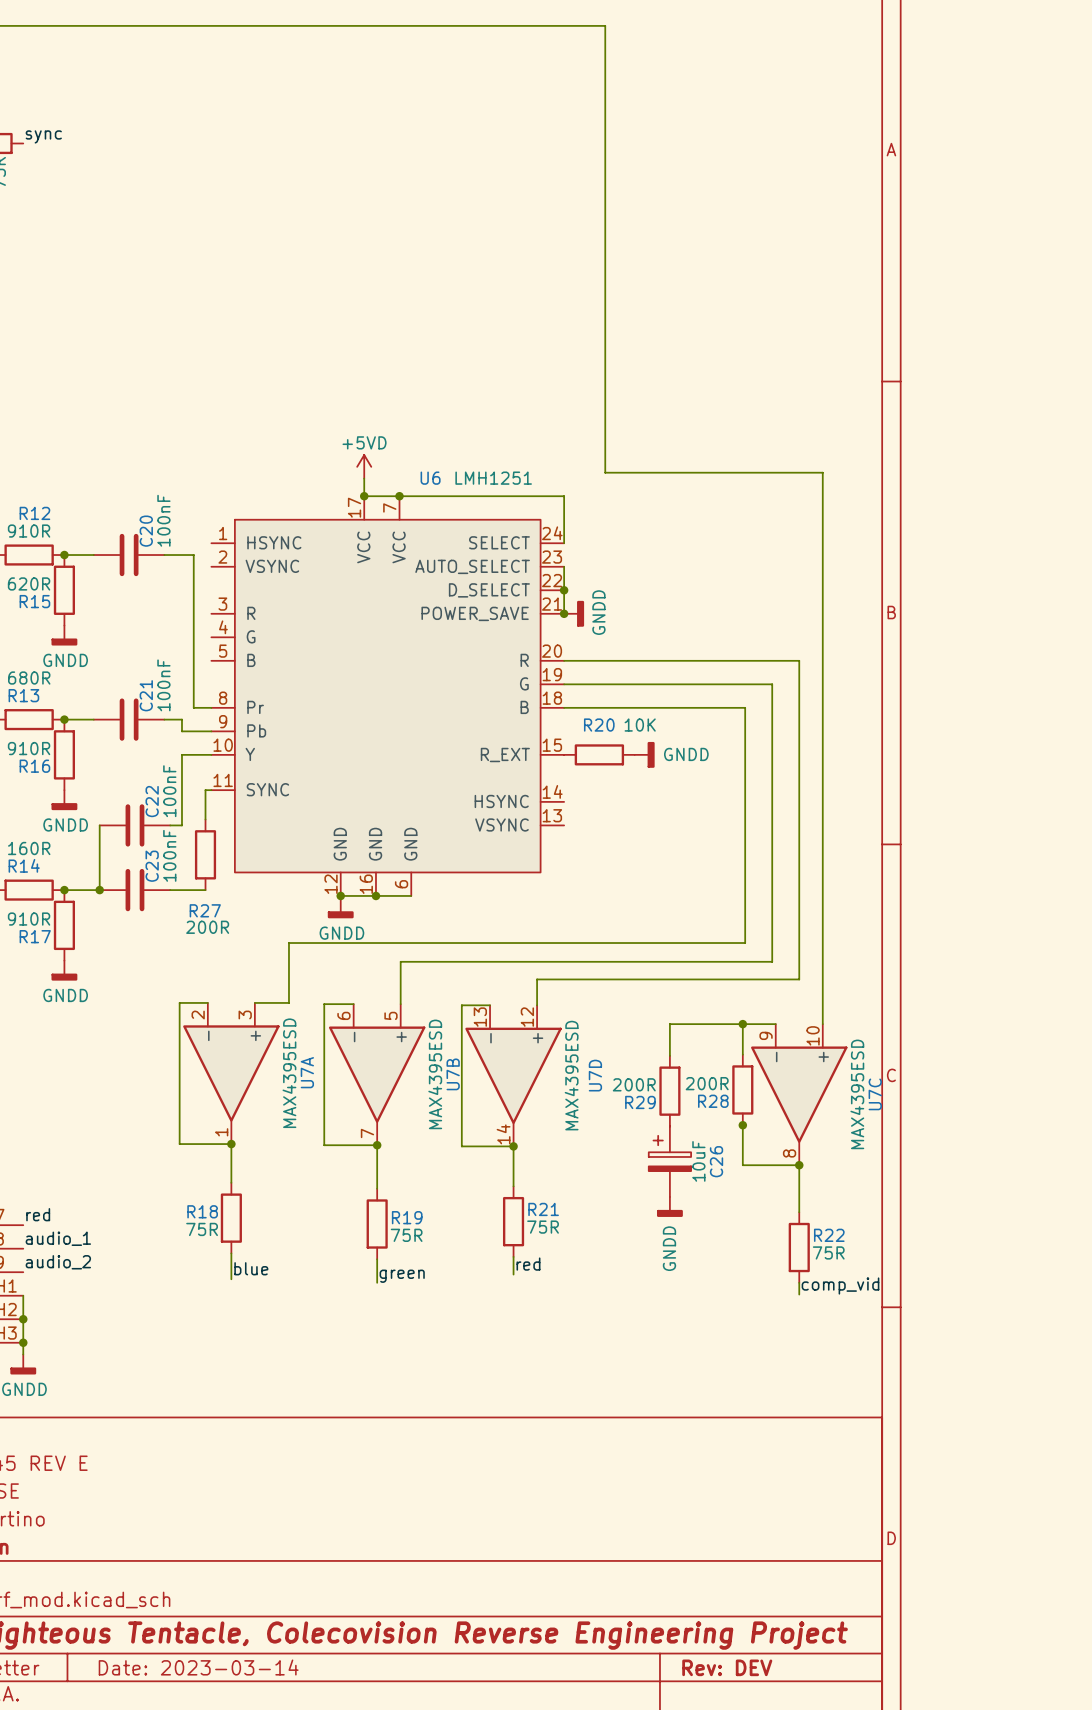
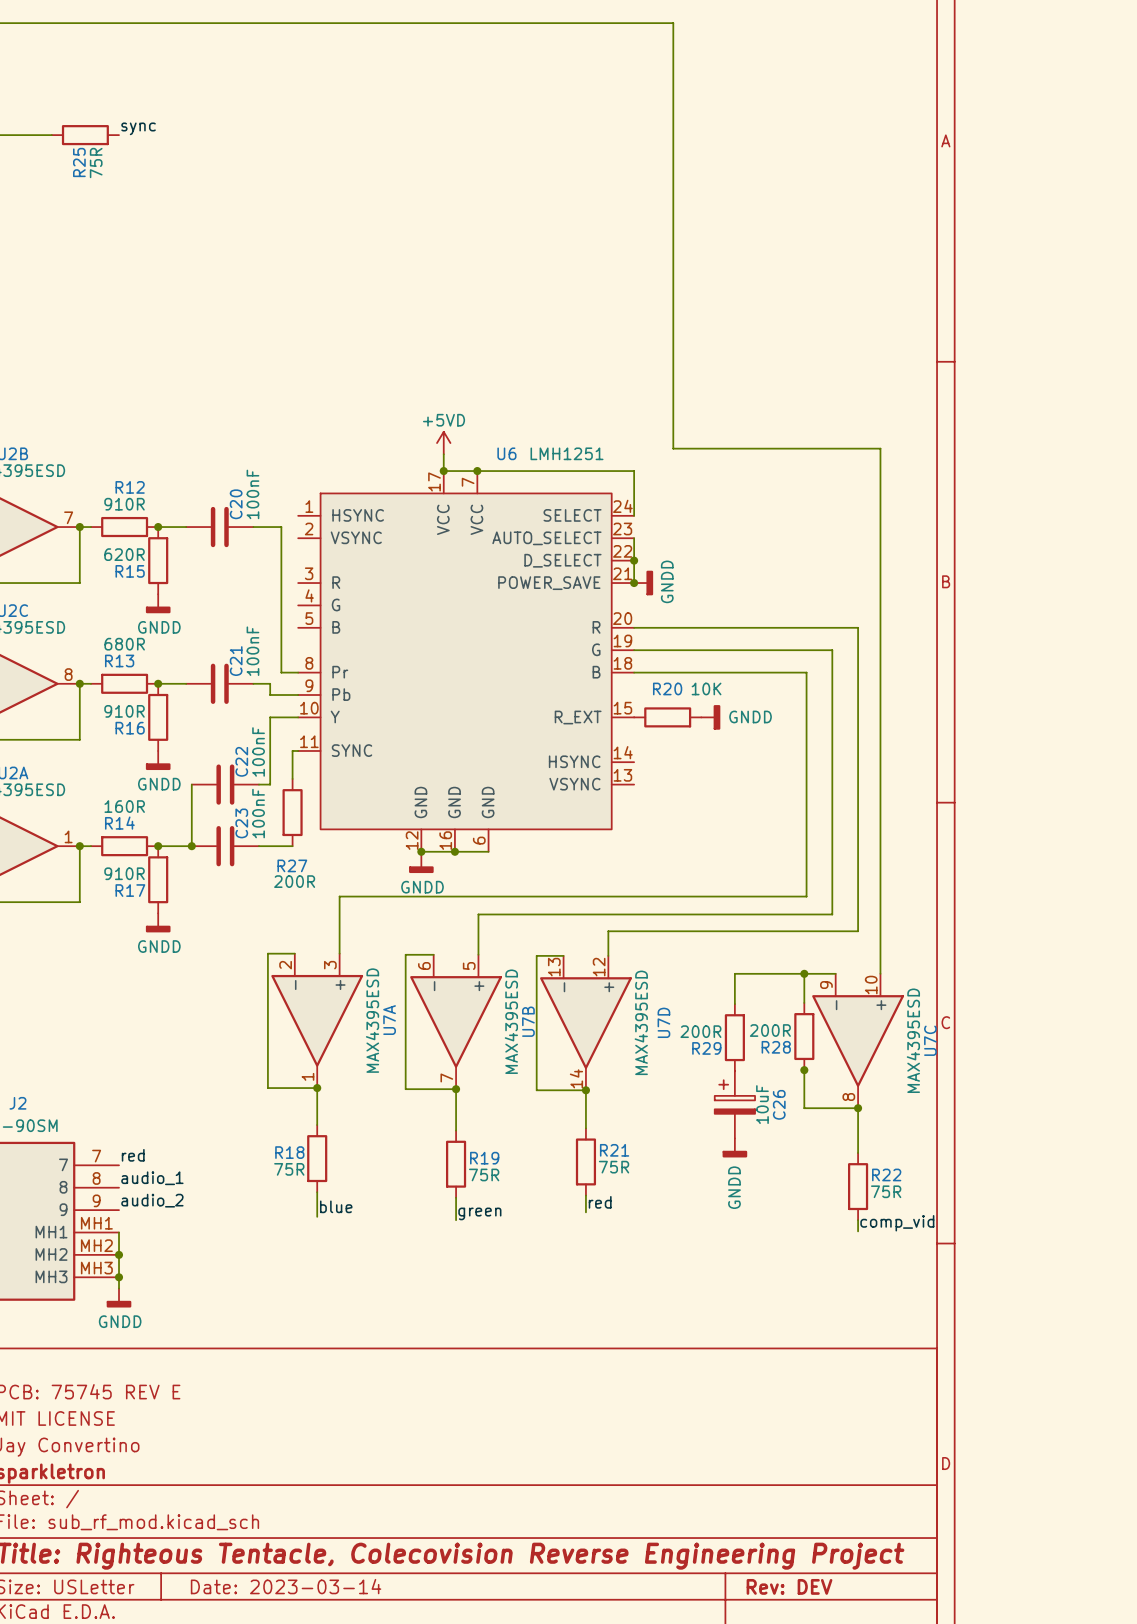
wire: (288, 943) (288, 1002) (254, 1002) -> (372, 896) (339, 896) (339, 953)

